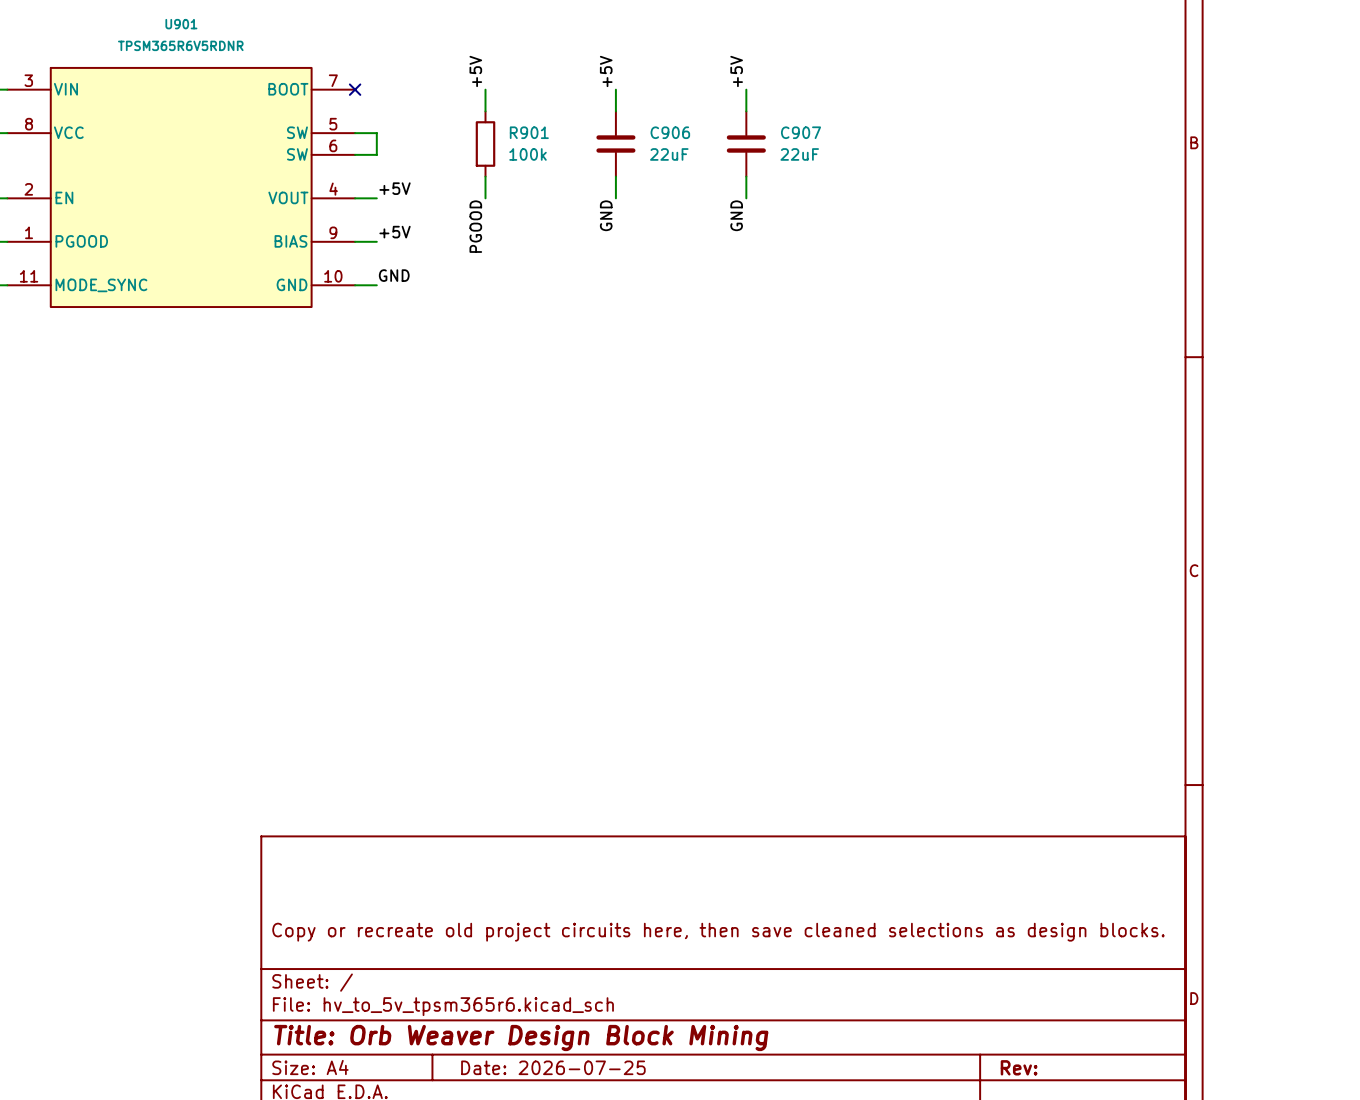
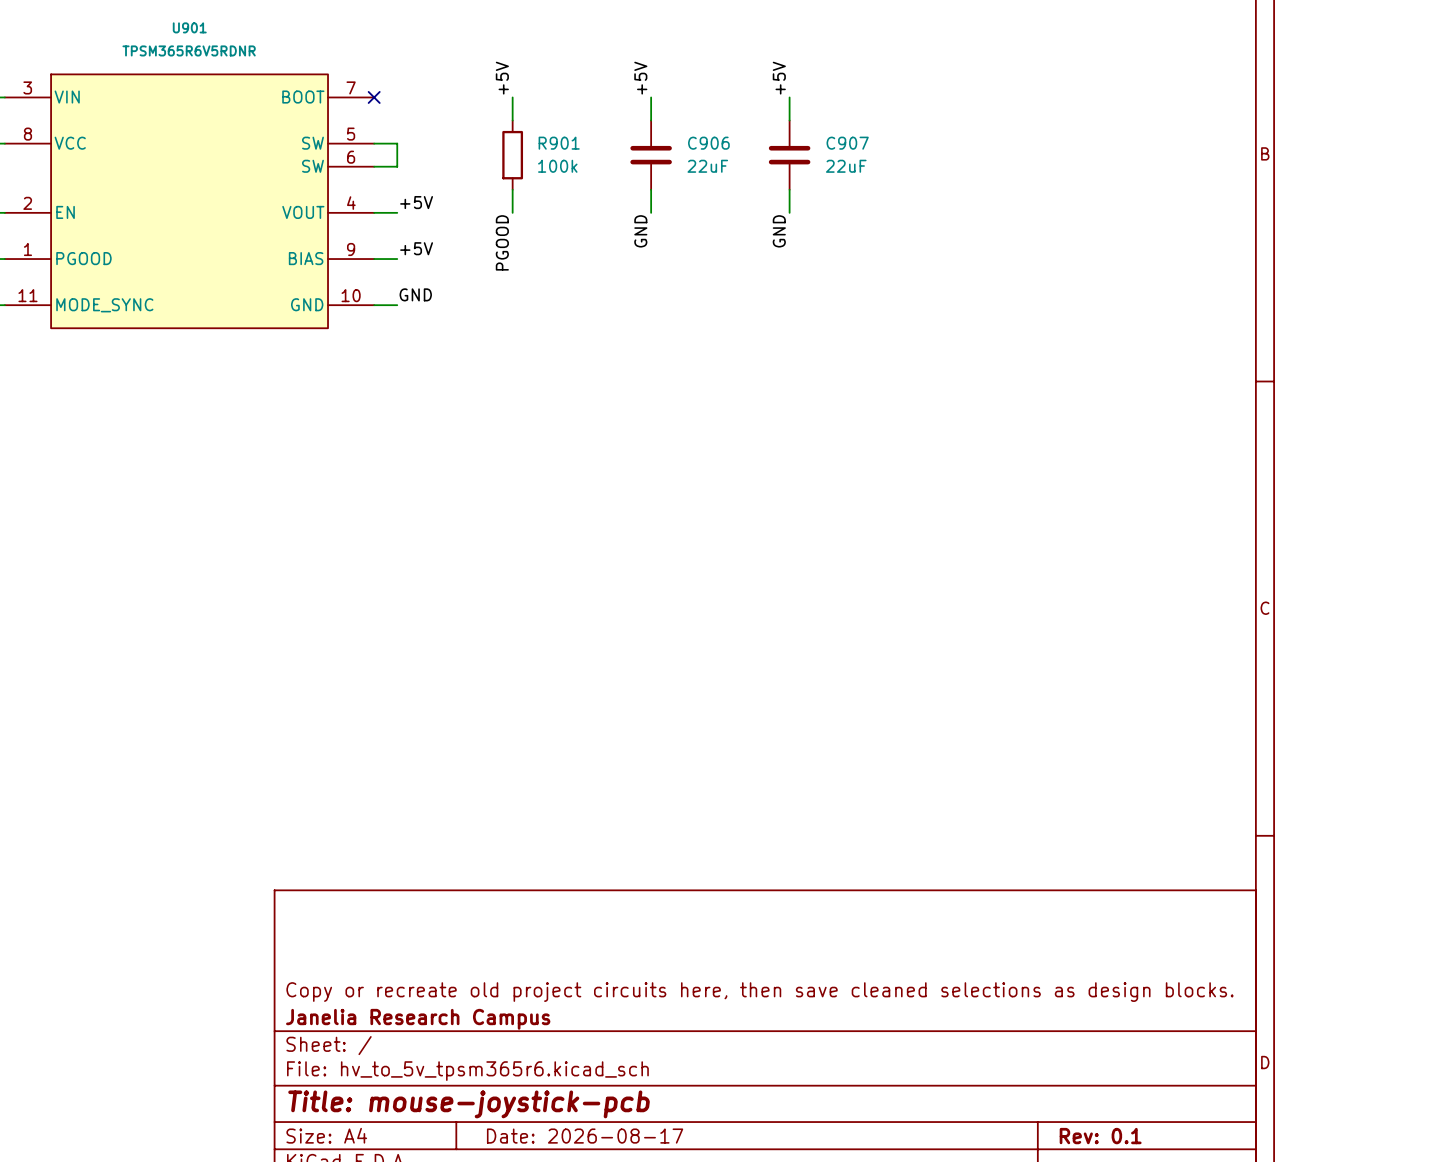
title block: none -> Janelia Research Campus (418, 1019)
title block: Title: Orb Weaver Design Block Mining (521, 1037) -> Title: mouse-joystick-pcb (469, 1104)
title block: Date: 2026-07-25 (553, 1067) -> Date: 2026-08-17 (585, 1136)
title block: Rev: (1019, 1067) -> Rev: 0.1 (1100, 1136)

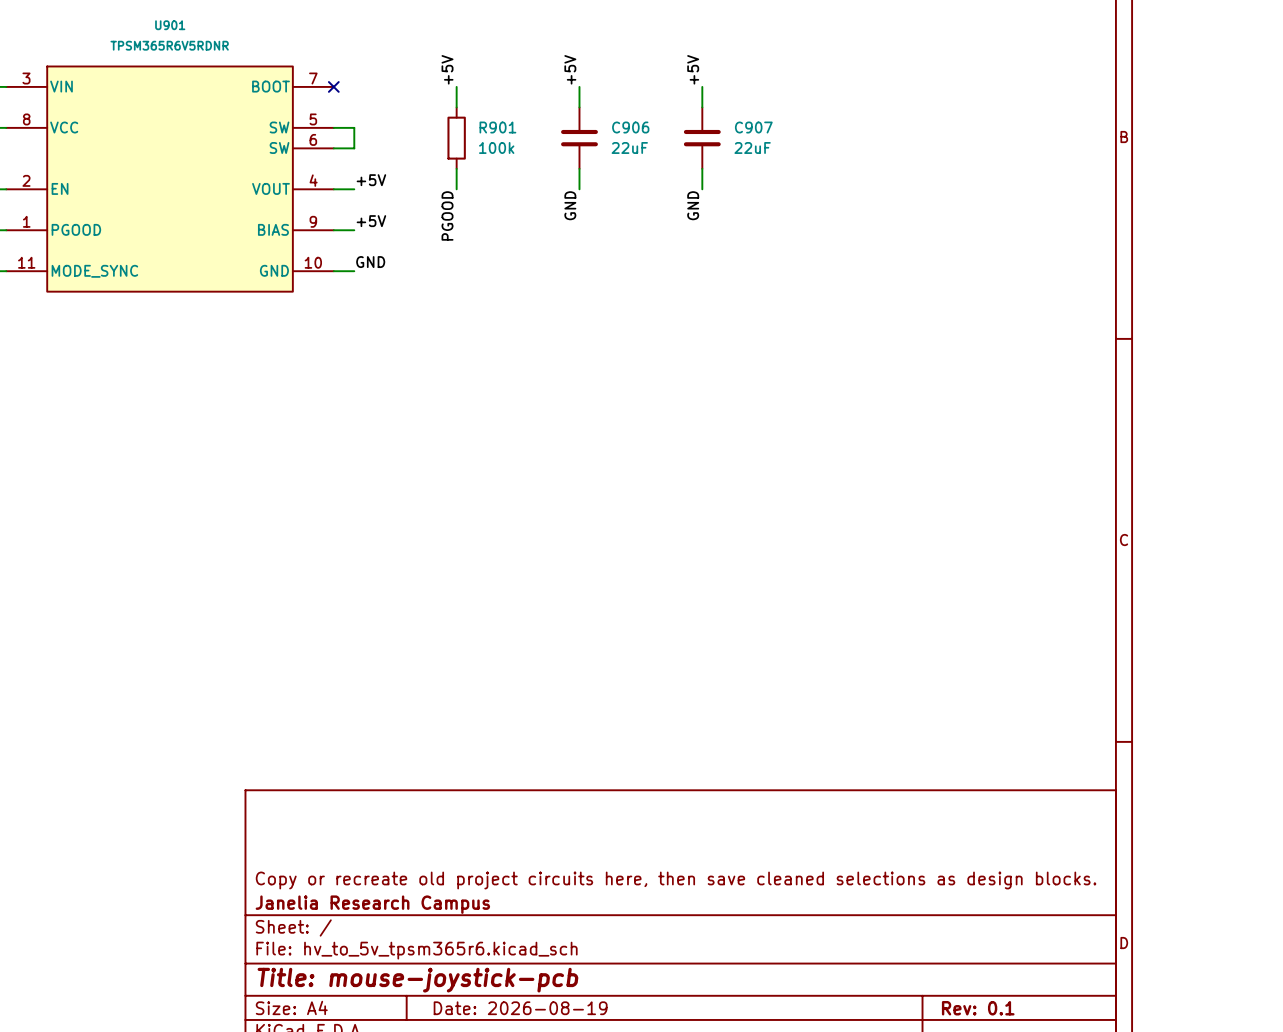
title block: Date: 2026-08-17 (585, 1136) -> Date: 2026-08-19 (520, 1008)

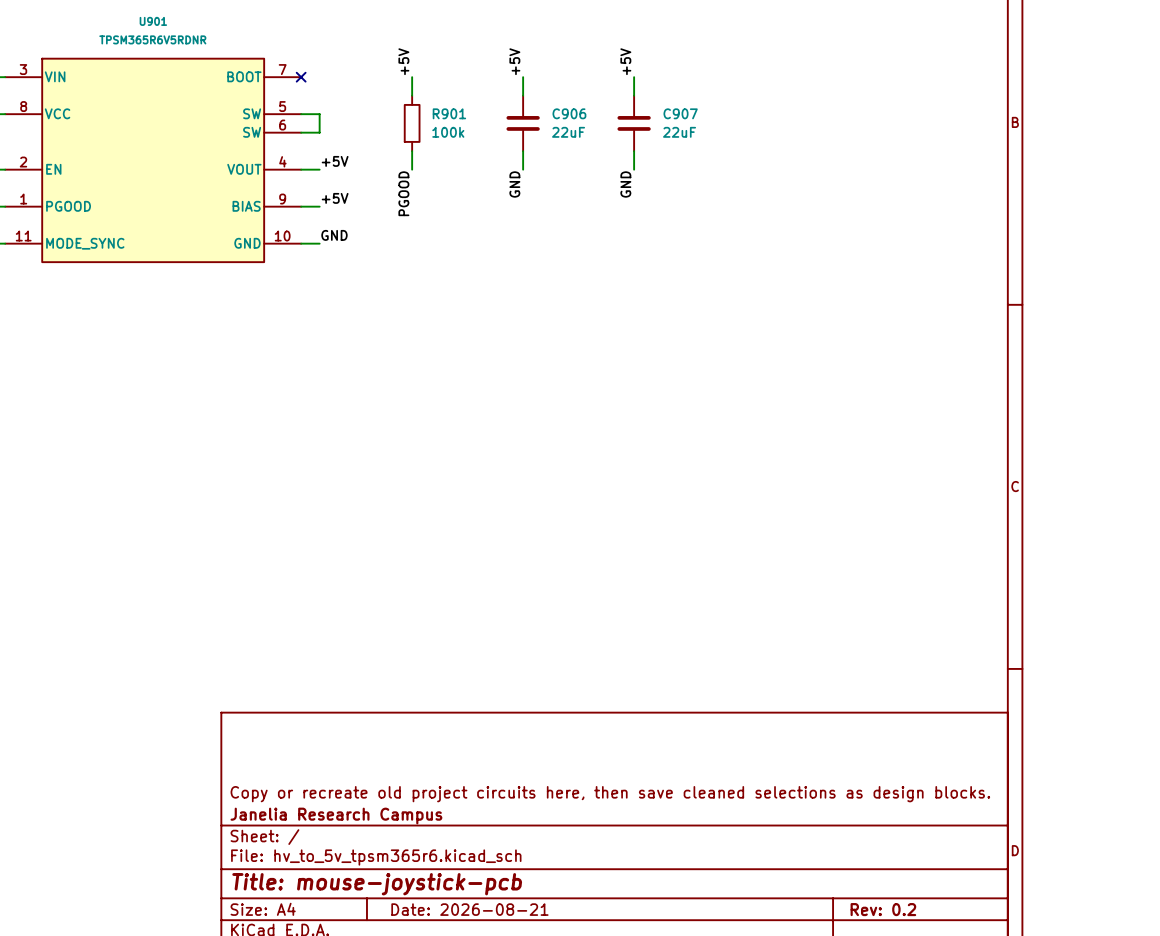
title block: Date: 2026-08-19 (520, 1008) -> Date: 2026-08-21 (469, 909)
title block: Rev: 0.1 (978, 1008) -> Rev: 0.2 (883, 909)

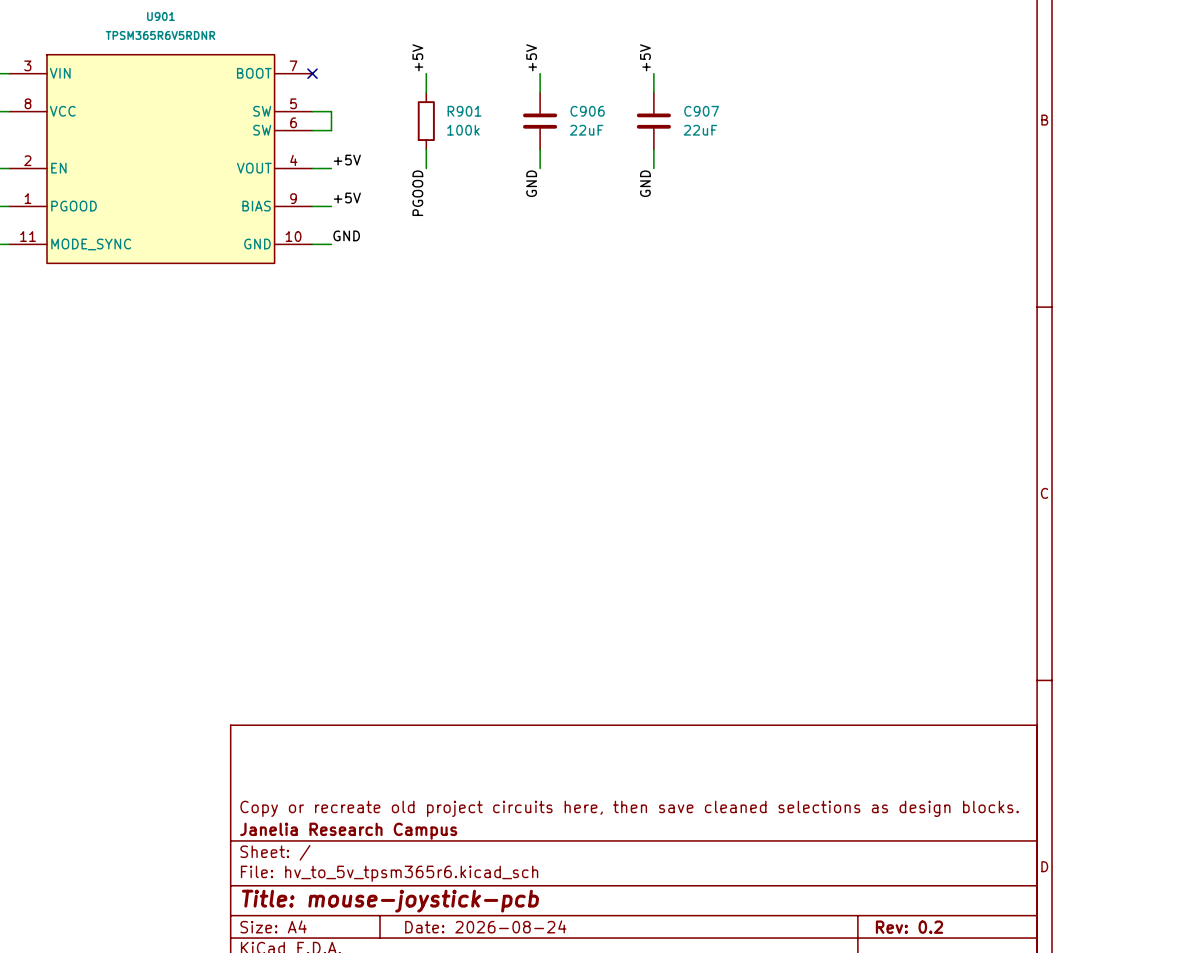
title block: Date: 2026-08-21 (469, 909) -> Date: 2026-08-24 (485, 926)

